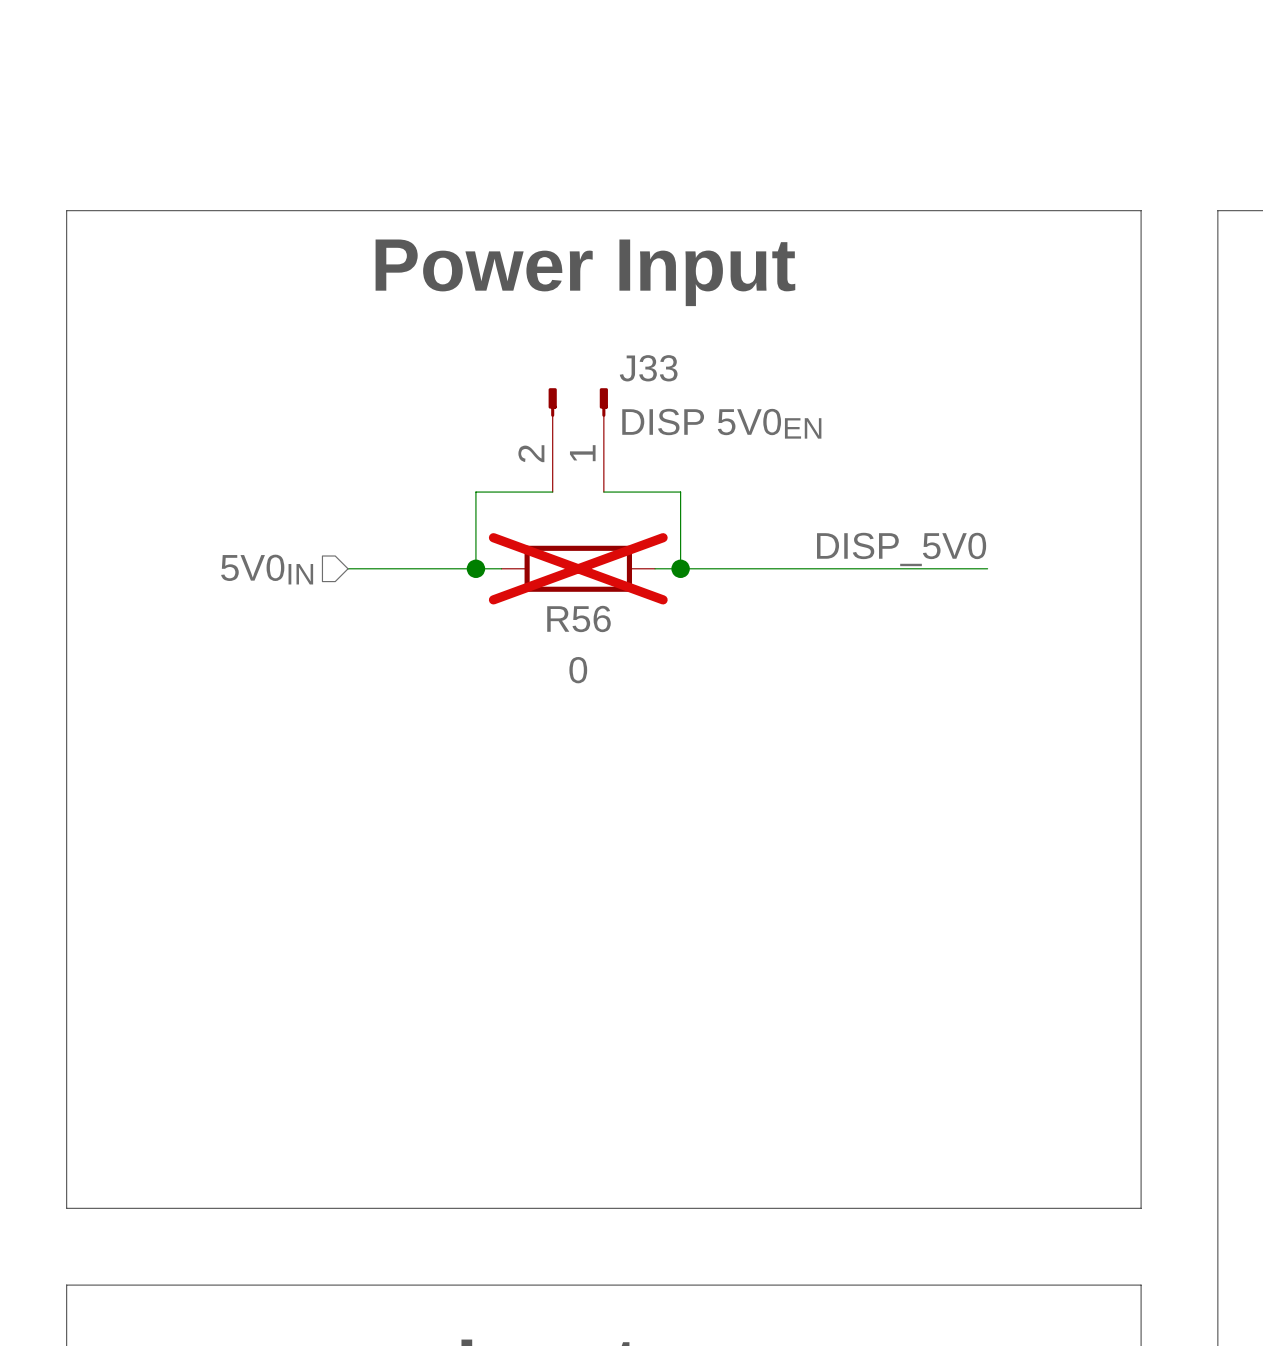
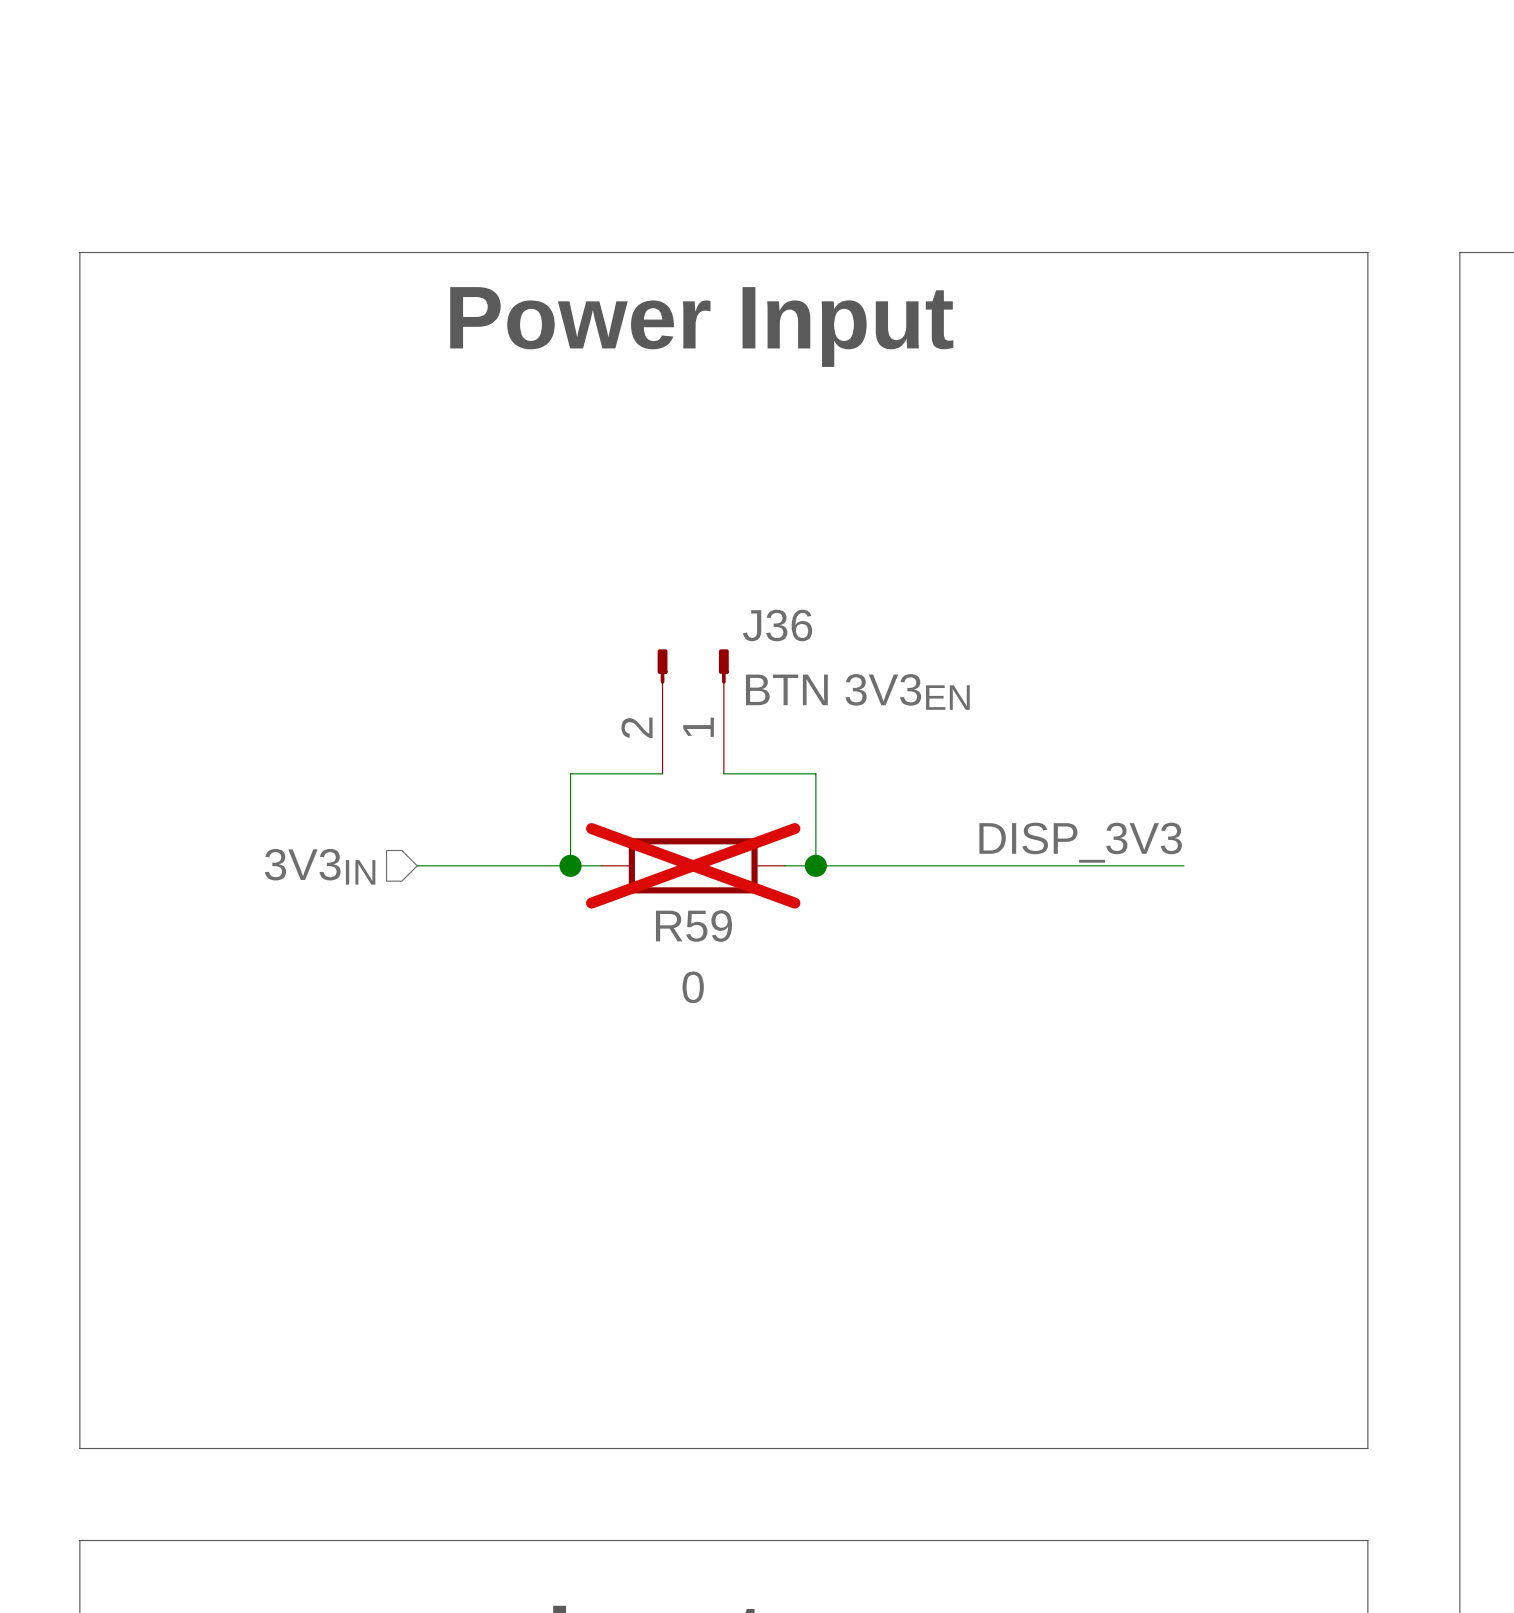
J33: DISP 5V0EN (578, 440) -> none
wire: (552, 492) (475, 492) (475, 568) -> (662, 773) (570, 773) (570, 865)
wire: (603, 492) (680, 492) (680, 568) -> (723, 773) (815, 773) (815, 865)
label: DISP_5V0 (901, 549) -> none
wire: (348, 568) (501, 568) -> (417, 865) (601, 865)
junction: (475, 568) -> none
R56: 0 (578, 568) -> none
wire: (655, 568) (987, 568) -> (785, 865) (1183, 865)
junction: (680, 568) -> none
hierarchical label: 5V0IN (267, 569) -> none
J36: none -> BTN 3V3EN (693, 711)
label: none -> DISP_3V3 (1080, 842)
junction: none -> (570, 865)
R59: none -> 0 (693, 865)
junction: none -> (815, 865)
hierarchical label: none -> 3V3IN (320, 866)

